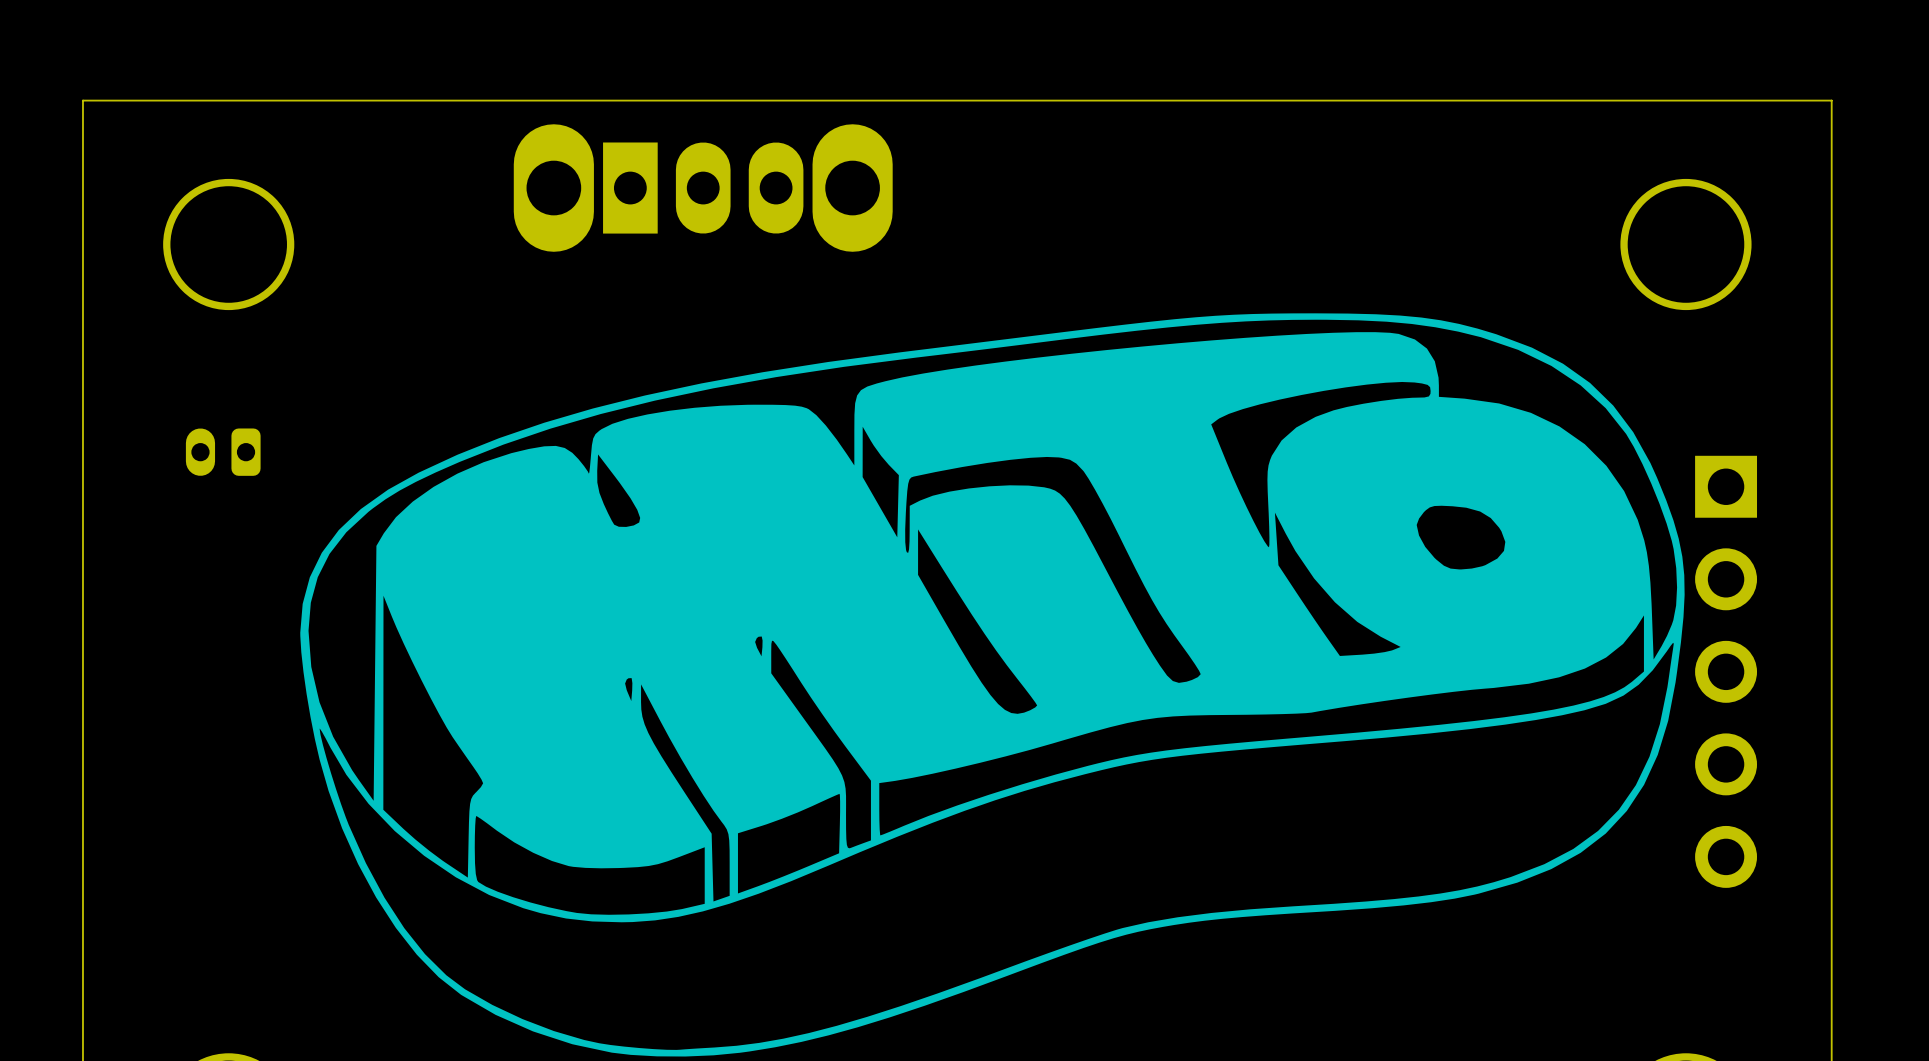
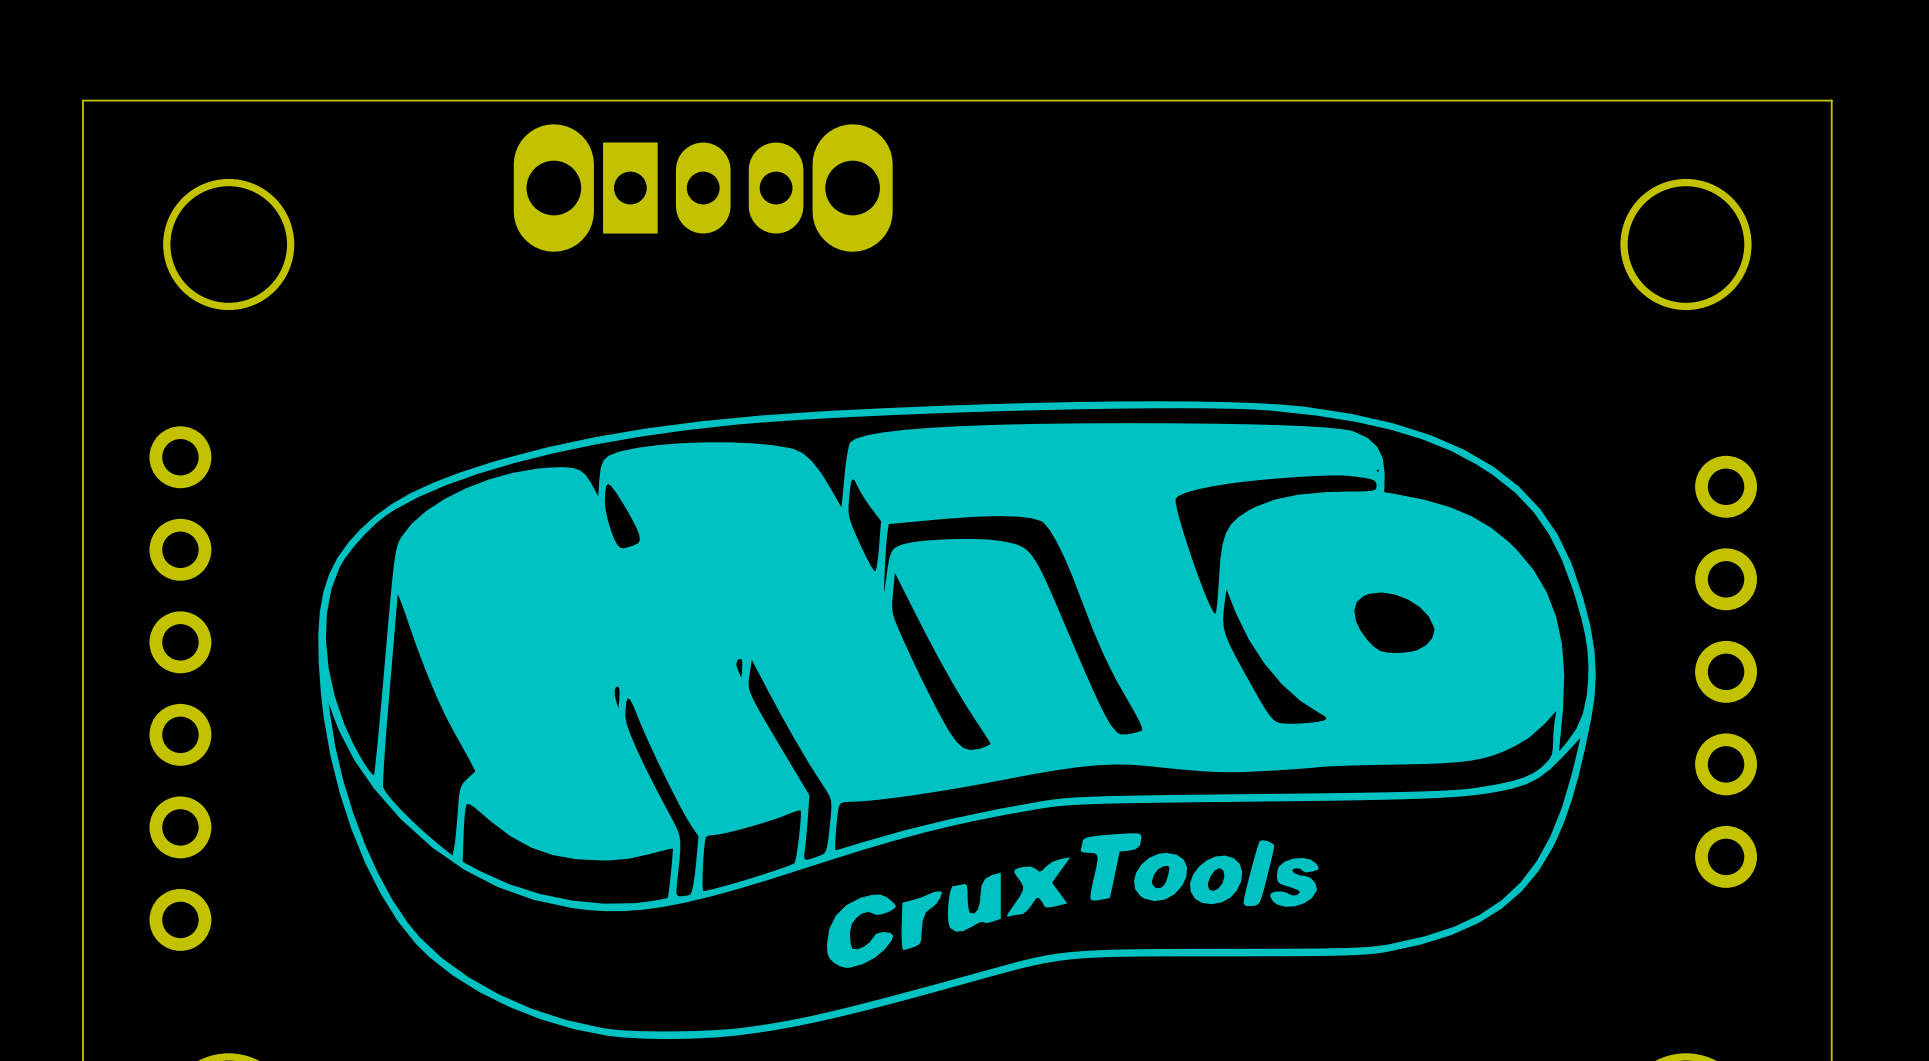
drawing: [300, 313, 1685, 1057] -> none
drawing: none -> [318, 401, 1596, 1040]
part: (223, 452) -> none
part footprint: [1695, 455, 1758, 888] -> [1695, 455, 1758, 888]
part: none -> (180, 688)

